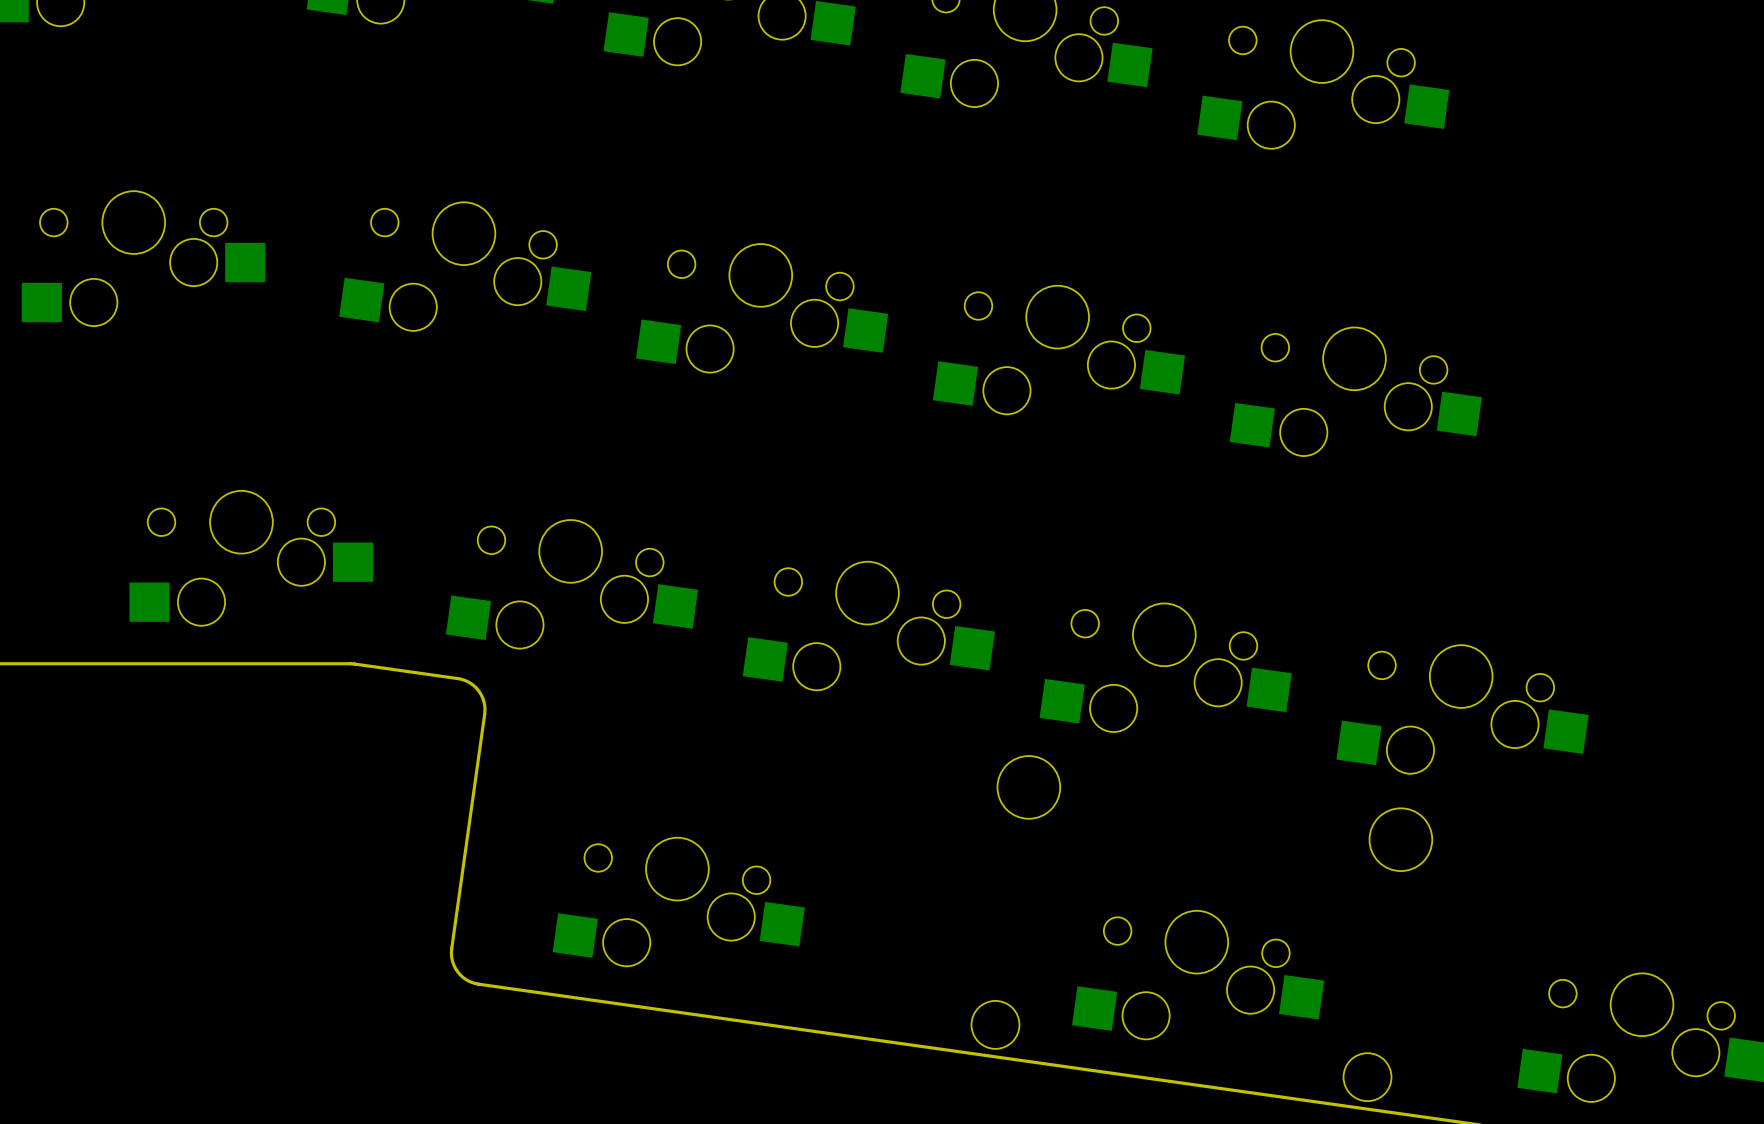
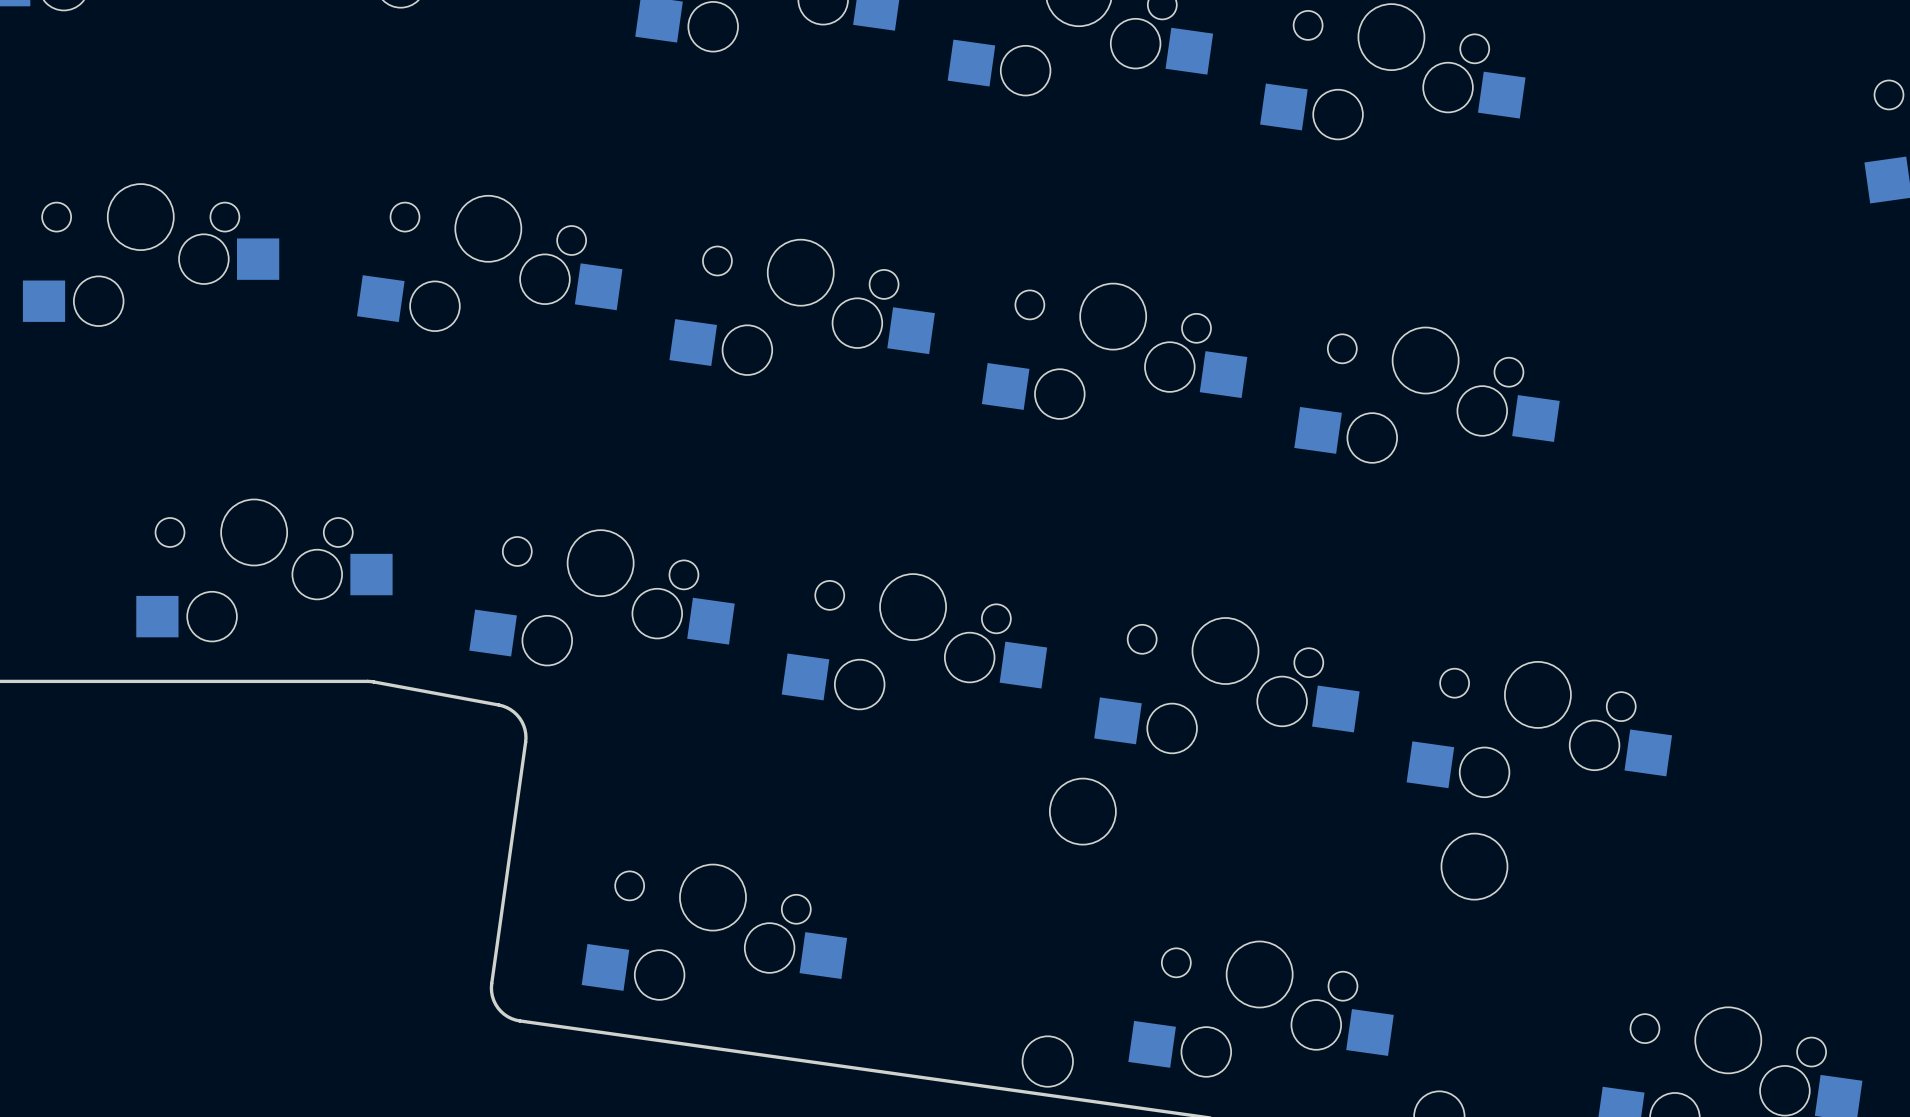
board edge: (349, 663) (461, 679) (475, 687) (482, 697) (484, 714) (451, 952) (455, 968) (463, 977) (474, 983) (493, 986) -> (367, 681) (502, 706) (517, 714) (523, 725) (525, 742) (491, 987) (493, 1000) (500, 1011) (511, 1018) (519, 1020)

